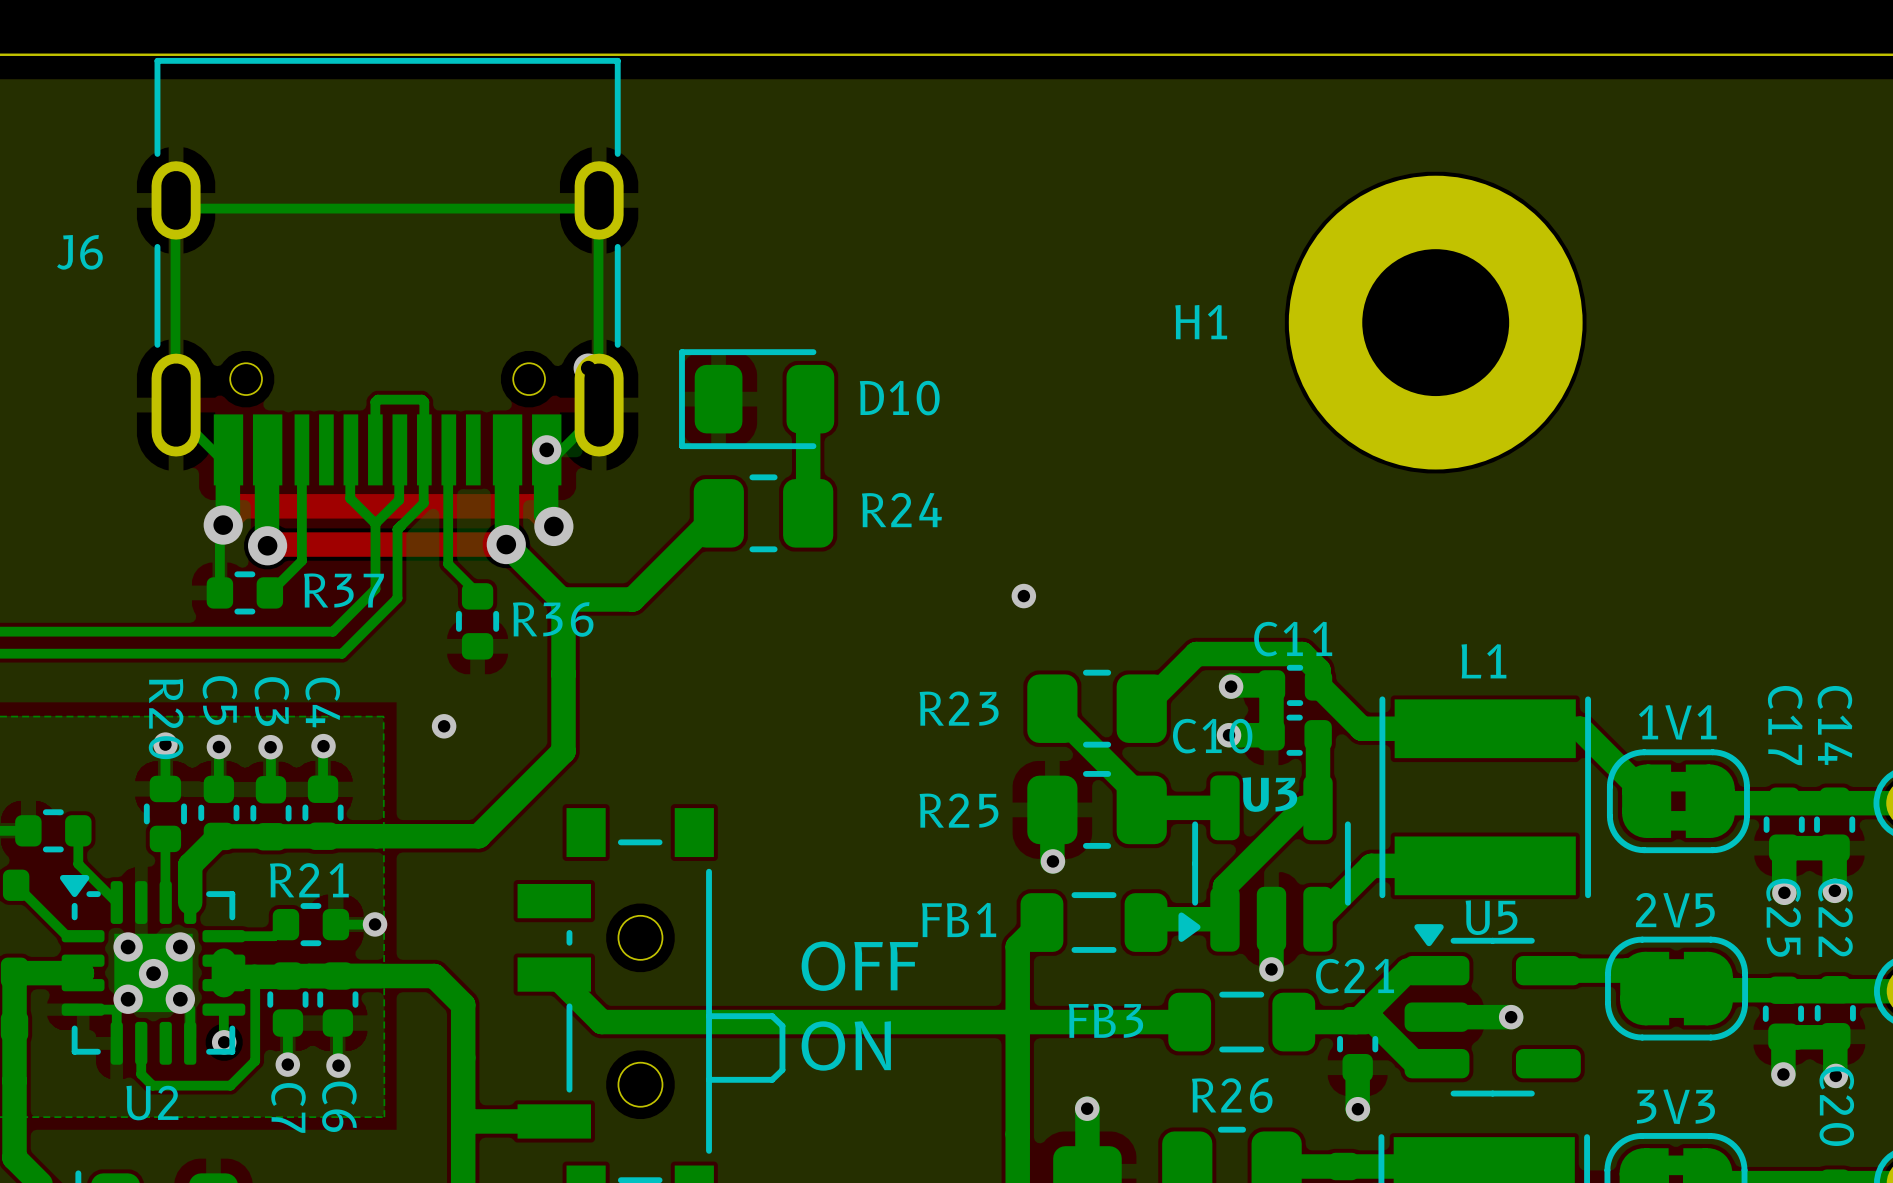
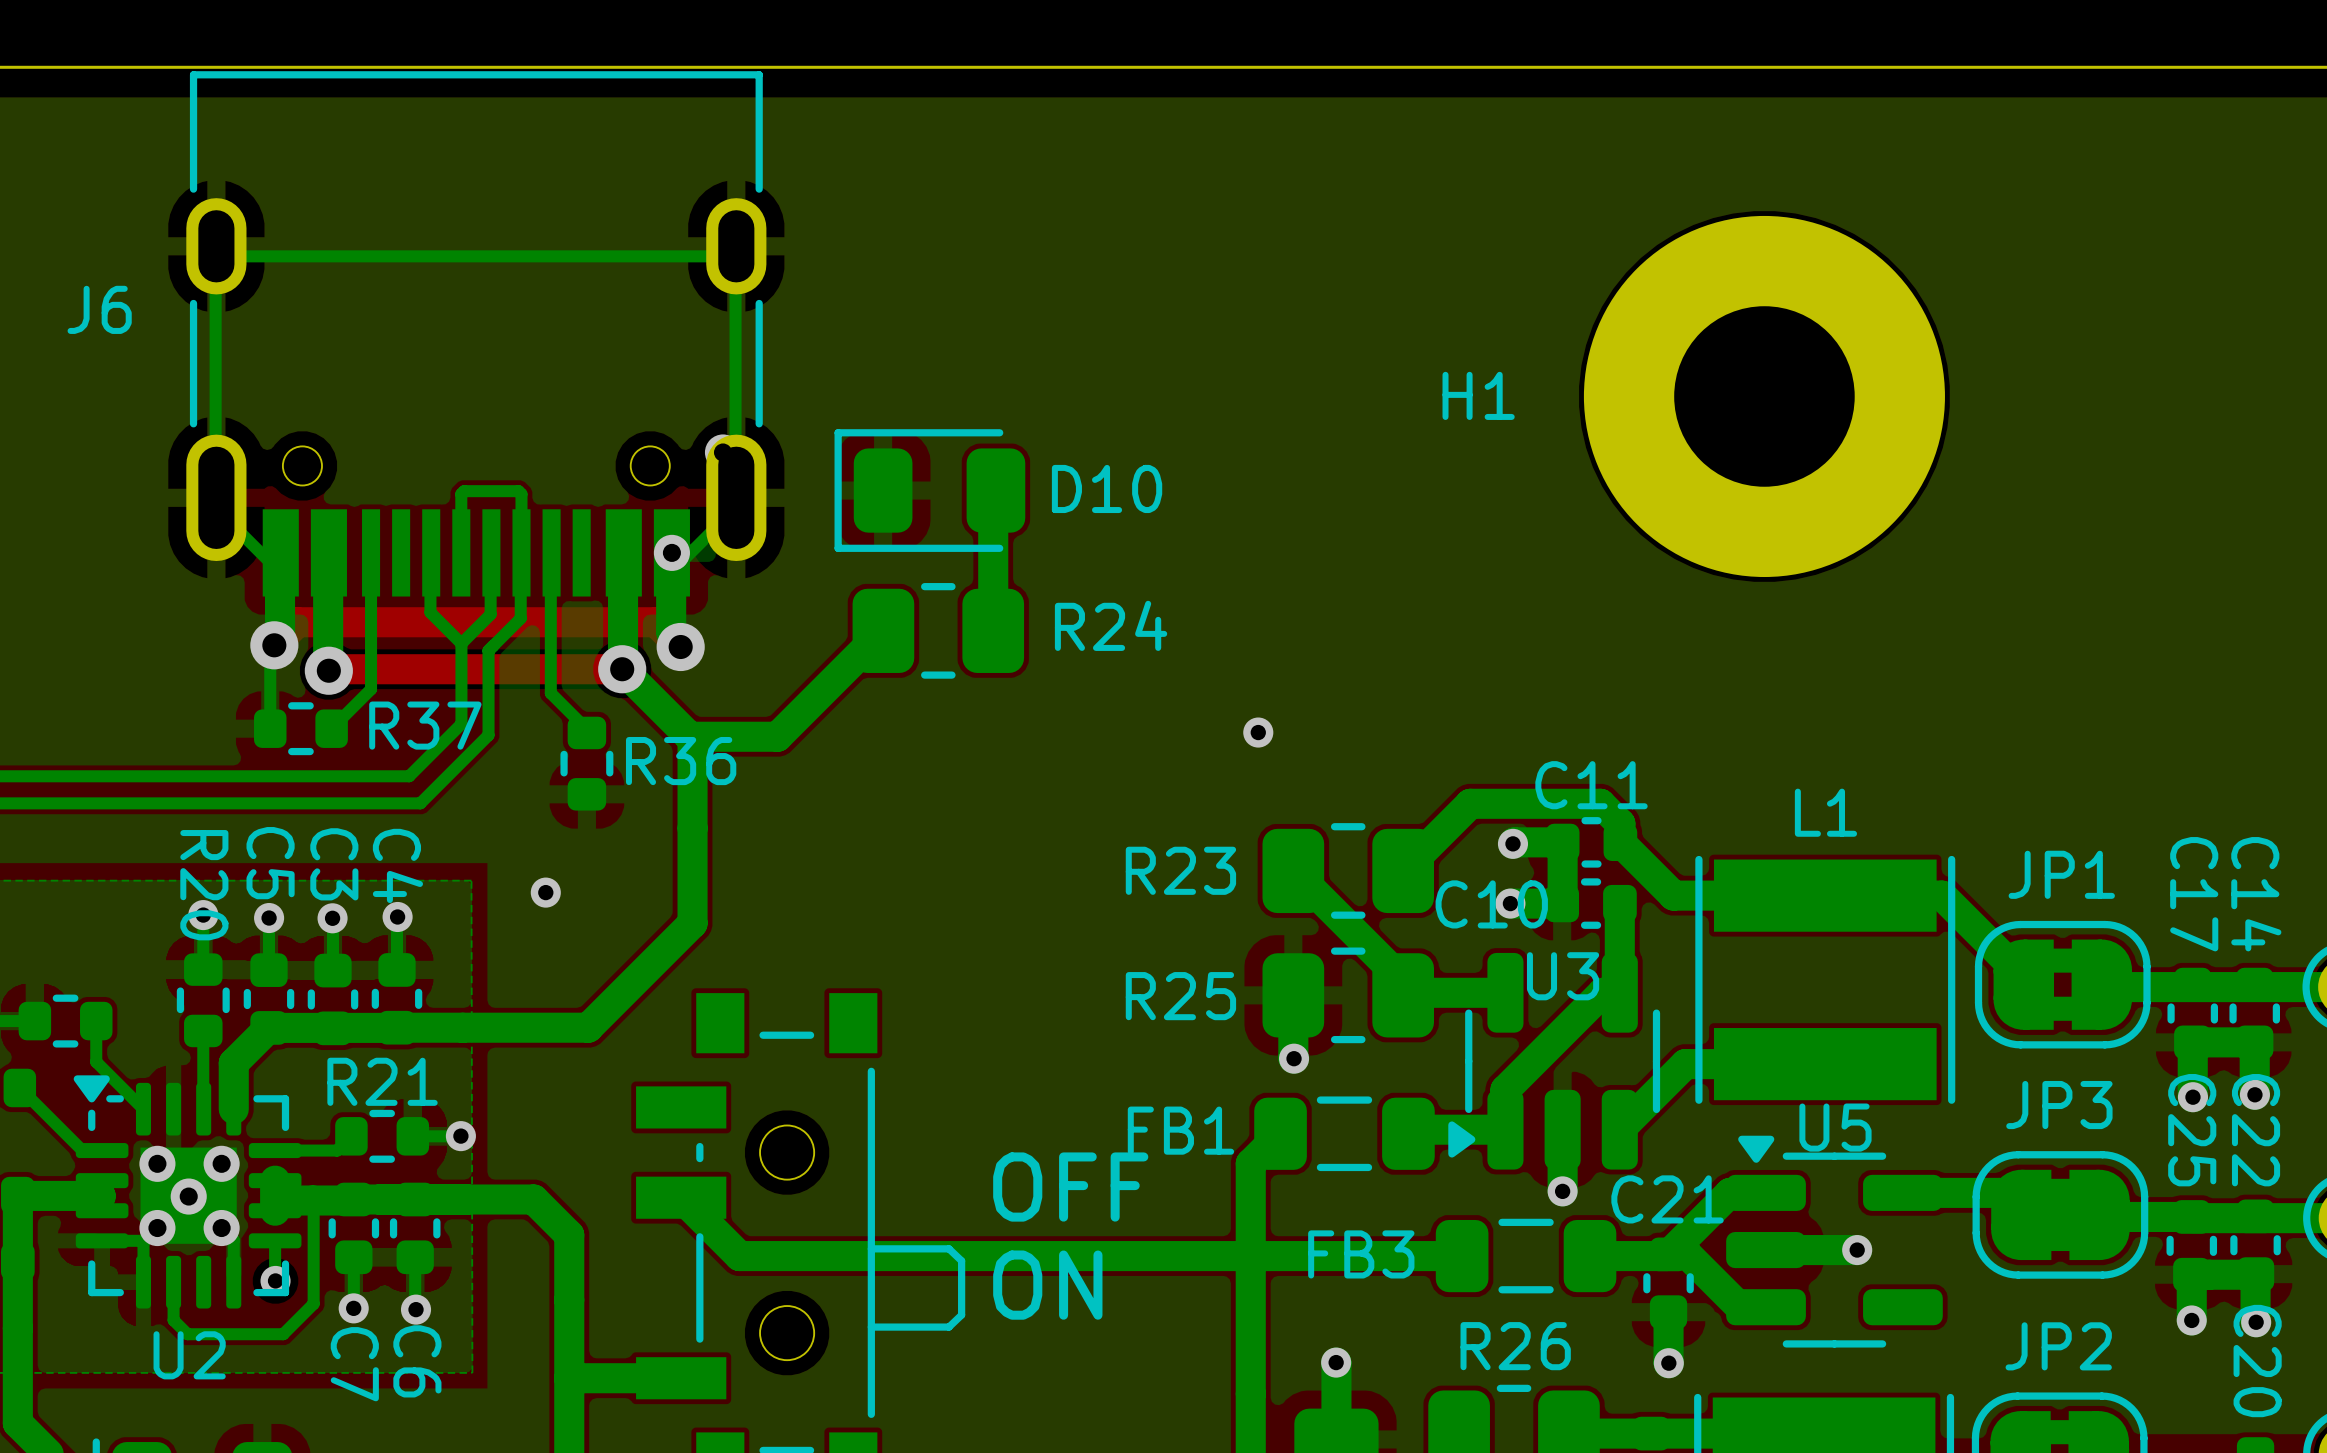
1V1 name: 1V1 (1677, 722) -> JP1 (2061, 874)
JP3 name: none -> JP3 (2059, 1105)
text: 2V5 (1675, 910) -> none
JP2 name: none -> JP2 (2058, 1346)
text: 3V3 (1676, 1106) -> none

